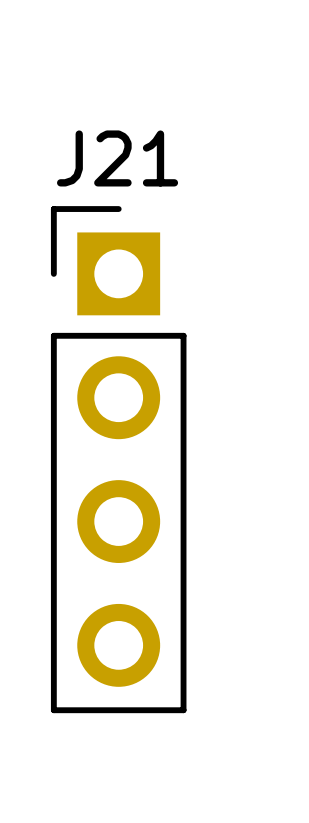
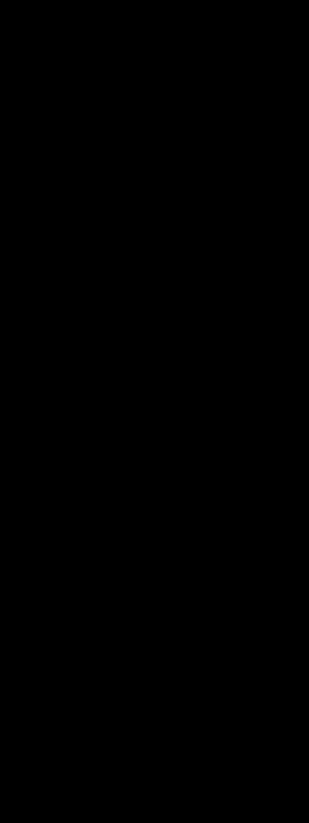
J21: (118, 459) -> none

